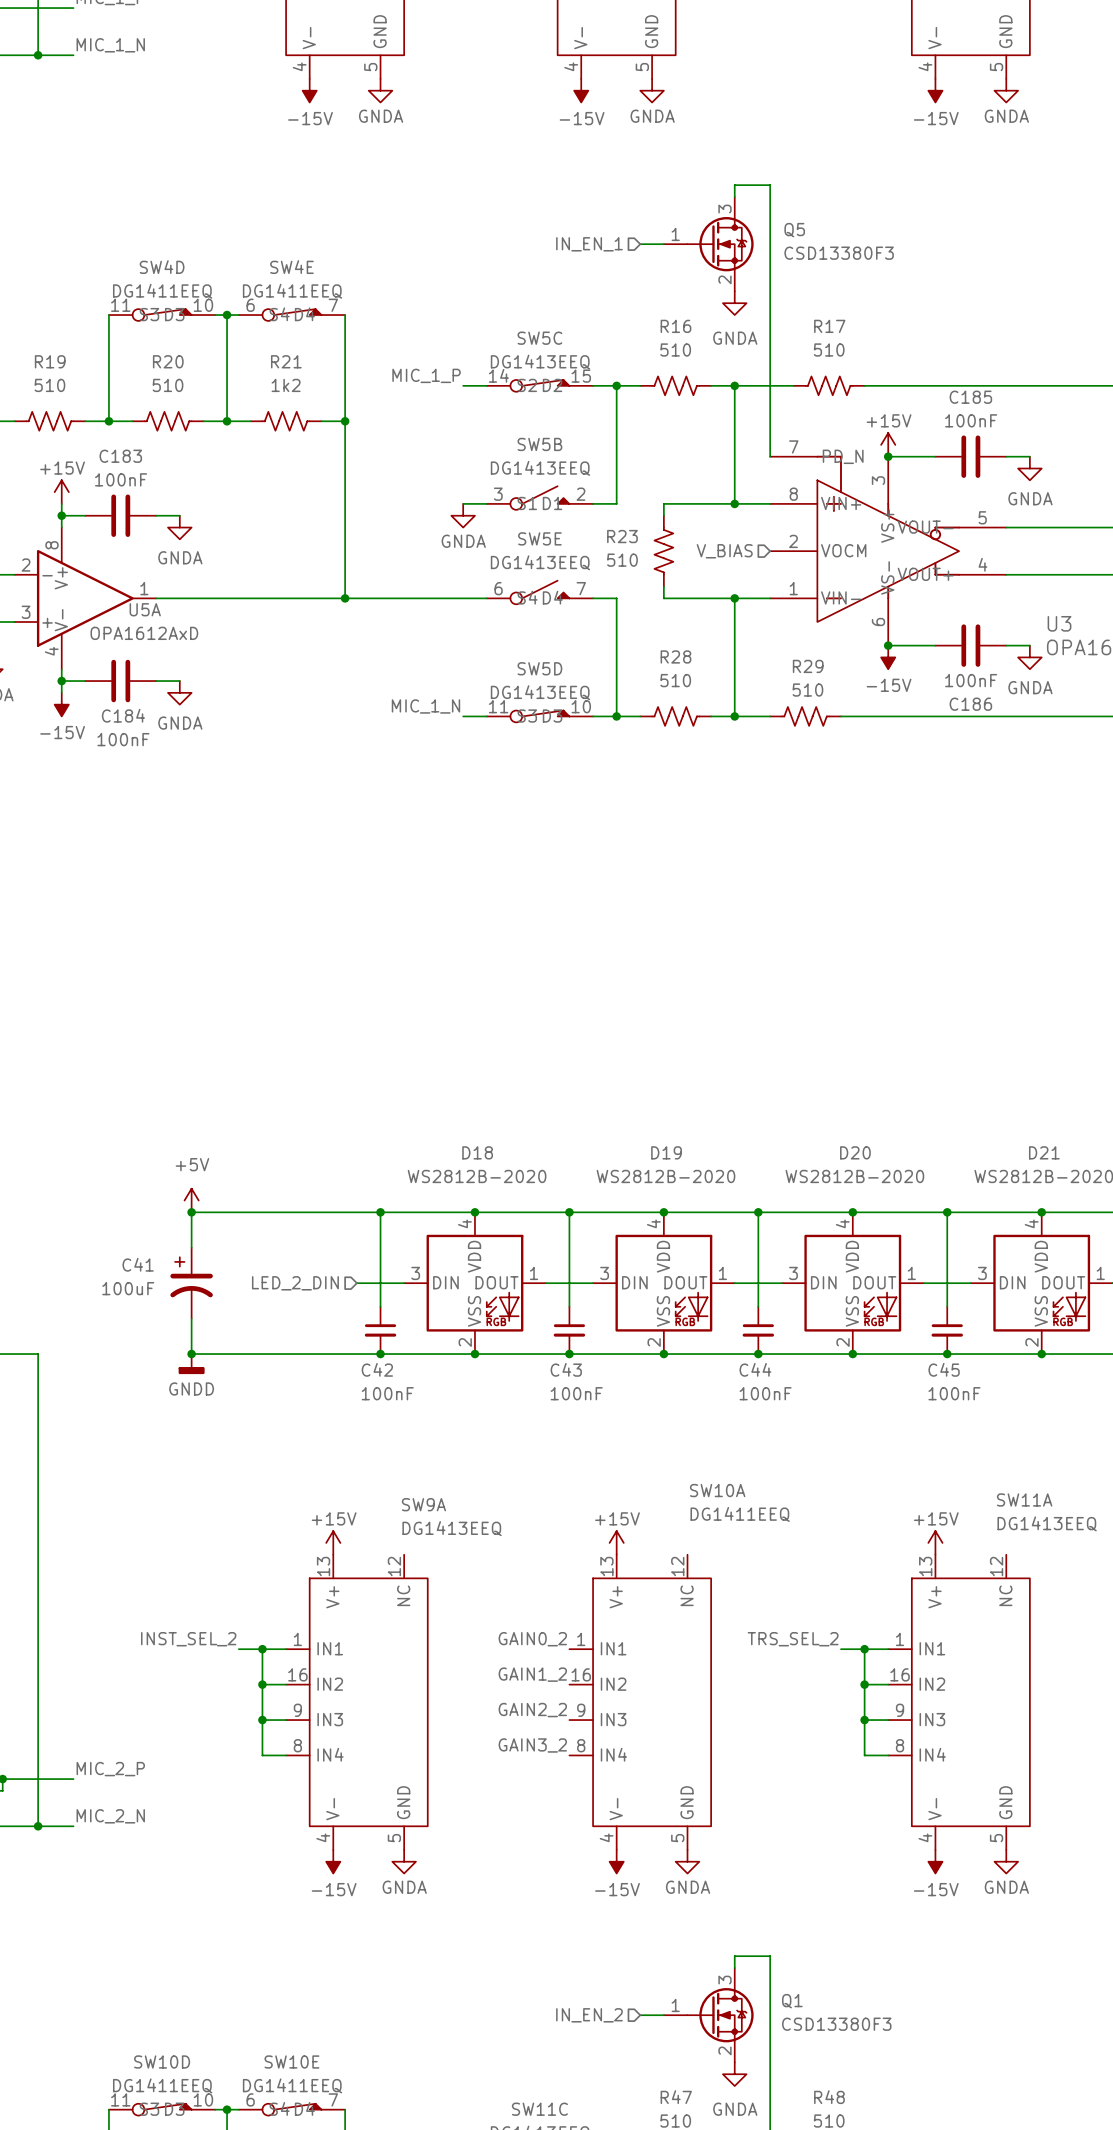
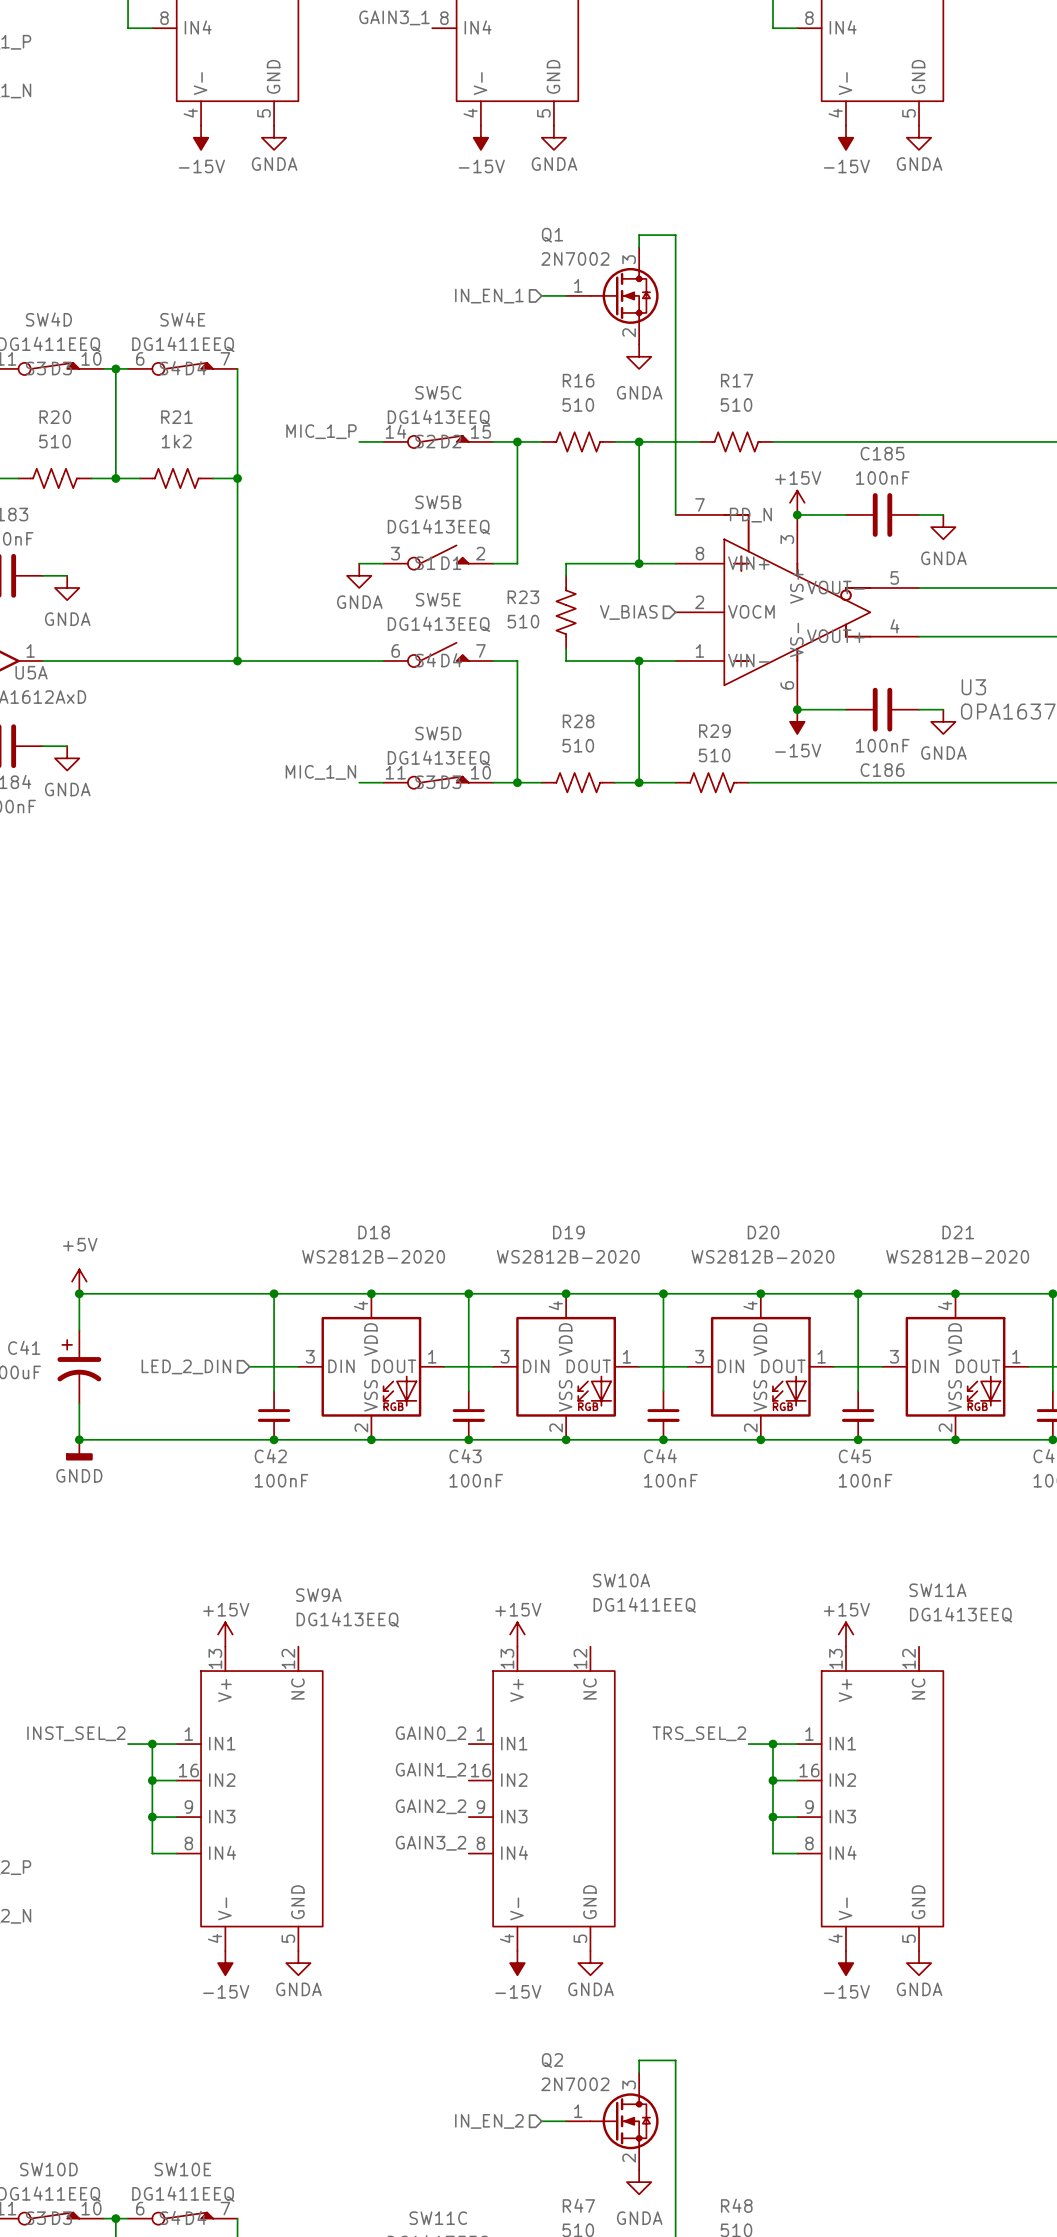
Q5: CSD13380F3 (708, 244) -> none
Q1 symbol: [663, 1967, 754, 2063] -> [566, 247, 659, 345]
Q1 name position: Q1 (792, 2001) -> Q1 (552, 235)
Q2: none -> 2N7002 (612, 2121)
Q1 value: CSD13380F3 (836, 2024) -> 2N7002 (575, 258)

